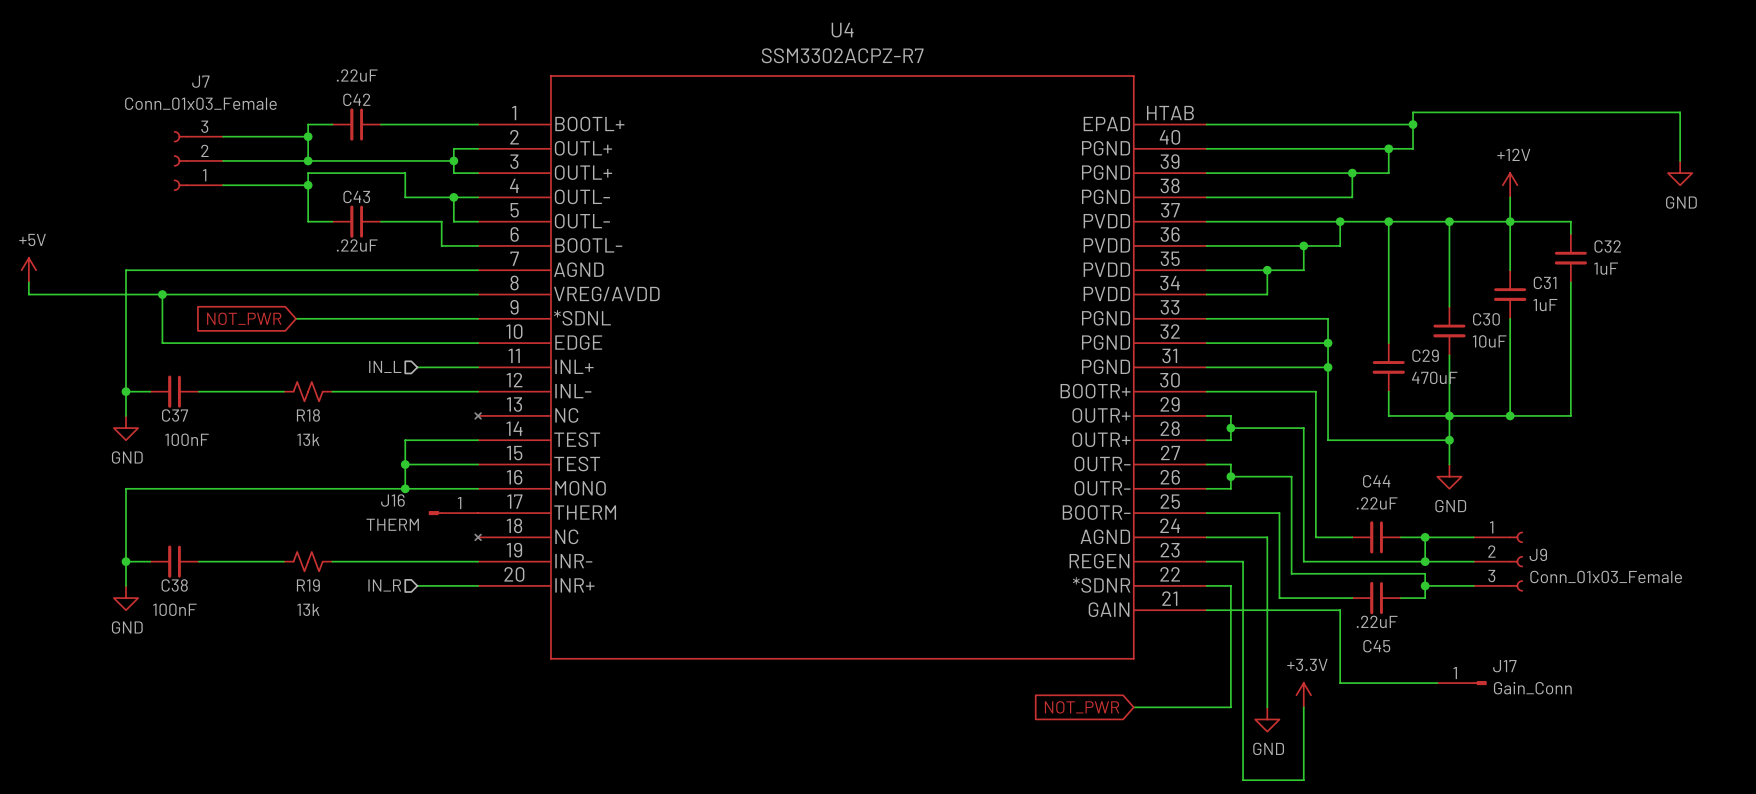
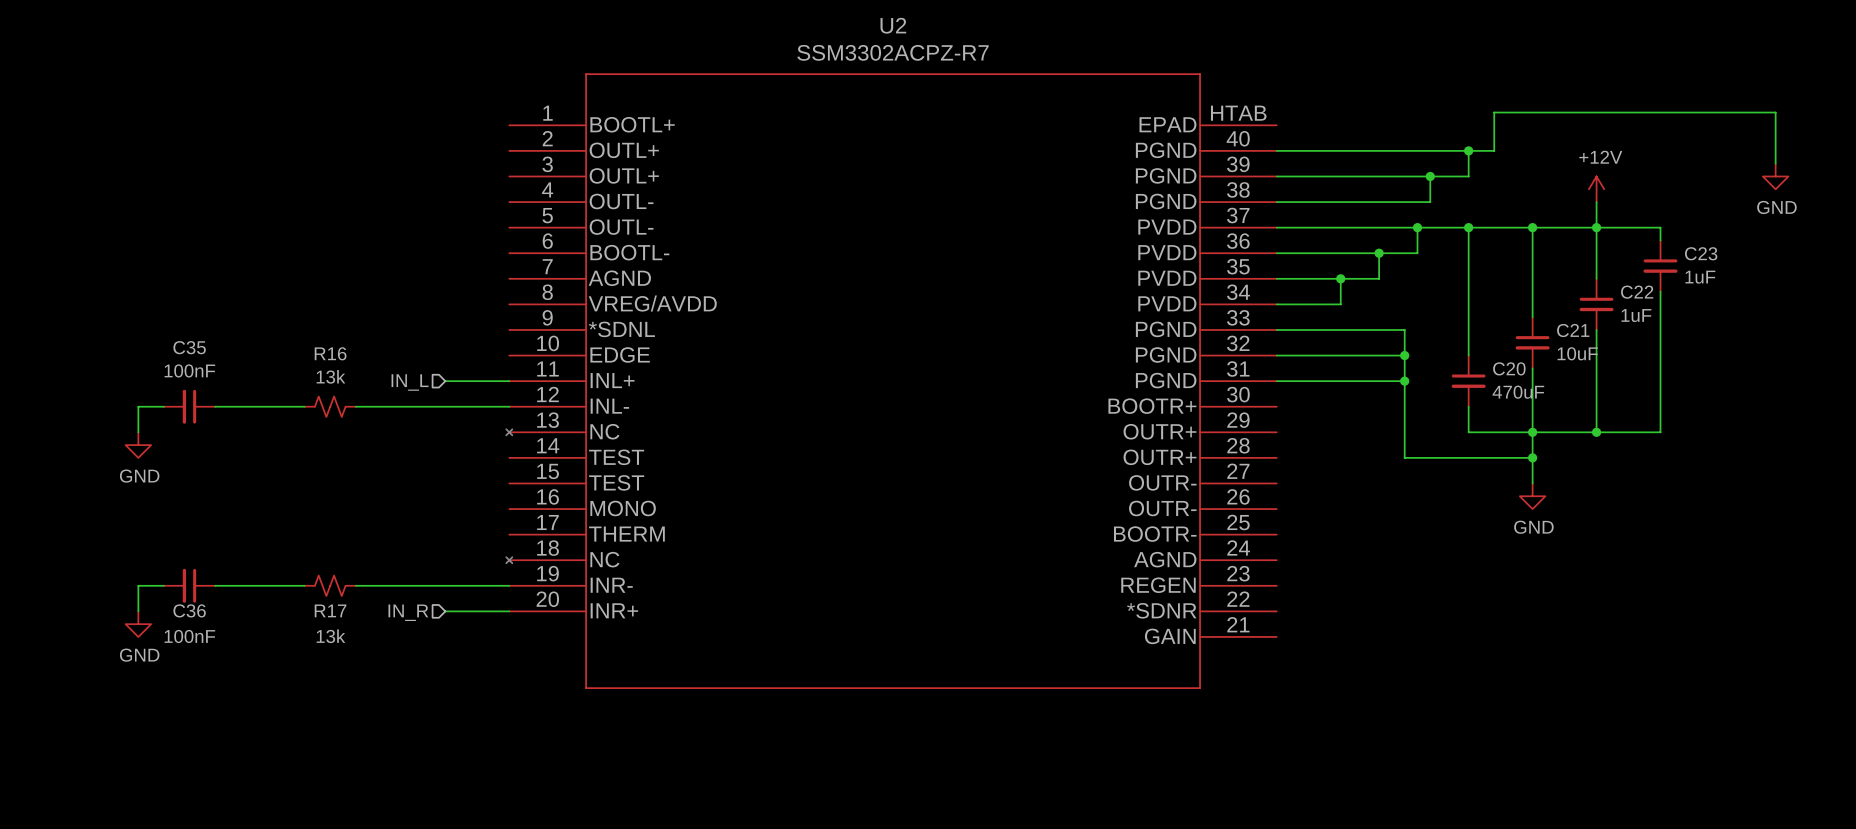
U4 name: U4 (842, 30) -> U2 (893, 25)
wire: (332, 124) (308, 124) (308, 160) -> none
C42: .22uF (356, 124) -> none
wire: (380, 124) (478, 124) -> none
wire: (1206, 124) (1413, 124) -> none
junction: (1413, 124) -> none
wire: (223, 136) (308, 136) -> none
junction: (308, 136) -> none
wire: (478, 148) (453, 148) (453, 173) (478, 173) -> none
J7: Conn_01x03_Female (198, 160) -> none
wire: (223, 160) (453, 160) -> none
junction: (308, 160) -> none
junction: (453, 160) -> none
wire: (223, 185) (308, 185) -> none
junction: (308, 185) -> none
wire: (453, 197) (453, 221) (478, 221) -> none
junction: (453, 197) -> none
wire: (478, 197) (405, 197) (405, 173) (308, 173) (308, 221) (332, 221) -> none
C43: .22uF (356, 221) -> none
wire: (380, 221) (441, 221) (441, 245) (478, 245) -> none
C32 name: C32 (1607, 246) -> C23 (1701, 253)
power symbol: +5V (28, 270) -> none
wire: (478, 270) (126, 270) (126, 391) -> none
wire: (28, 282) (28, 294) (478, 294) -> none
C31 name: C31 (1545, 282) -> C22 (1637, 292)
wire: (162, 294) (162, 343) (478, 343) -> none
junction: (162, 294) -> none
global label: NOT_PWR (244, 318) -> none
wire: (295, 318) (478, 318) -> none
C30 name: C30 (1486, 319) -> C21 (1573, 330)
C29 name: C29 (1425, 355) -> C20 (1509, 368)
junction: (126, 391) -> none
wire: (1206, 391) (1315, 391) (1315, 537) (1352, 537) -> none
C37 name: C37 (175, 415) -> C35 (189, 347)
R18 name: R18 (308, 415) -> R16 (330, 353)
wire: (1206, 415) (1230, 415) (1230, 440) (1206, 440) -> none
wire: (1230, 428) (1303, 428) (1303, 561) (1473, 561) -> none
junction: (1230, 428) -> none
C37 value position: 100nF (187, 439) -> 100nF (189, 370)
R18 value position: 13k (308, 439) -> 13k (330, 376)
wire: (478, 440) (405, 440) (405, 488) -> none
wire: (405, 464) (478, 464) -> none
junction: (405, 464) -> none
wire: (1206, 464) (1230, 464) (1230, 488) (1206, 488) -> none
wire: (1230, 476) (1291, 476) (1291, 573) (1425, 573) (1425, 598) (1400, 598) -> none
junction: (1230, 476) -> none
junction: (405, 488) -> none
wire: (478, 488) (126, 488) (126, 561) -> none
J16: THERM (453, 513) -> none
wire: (1206, 513) (1279, 513) (1279, 598) (1352, 598) -> none
wire: (1206, 537) (1267, 537) (1267, 707) -> none
C44: .22uF (1376, 537) -> none
wire: (1400, 537) (1473, 537) -> none
wire: (1425, 537) (1425, 561) -> none
junction: (1425, 537) -> none
junction: (126, 561) -> none
wire: (1206, 561) (1243, 561) (1243, 780) (1303, 780) (1303, 707) -> none
junction: (1425, 561) -> none
J9: Conn_01x03_Female (1498, 561) -> none
C38 name: C38 (174, 585) -> C36 (189, 610)
R19 name: R19 (308, 585) -> R17 (330, 610)
wire: (1206, 585) (1230, 585) (1230, 707) (1133, 707) -> none
wire: (1425, 585) (1473, 585) -> none
junction: (1425, 585) -> none
C45: .22uF (1376, 598) -> none
wire: (1206, 610) (1340, 610) (1340, 683) (1437, 683) -> none
J17: Gain_Conn (1461, 683) -> none
power symbol: +3.3V (1303, 695) -> none
global label: NOT_PWR (1082, 707) -> none
power symbol: GND (1267, 719) -> none

